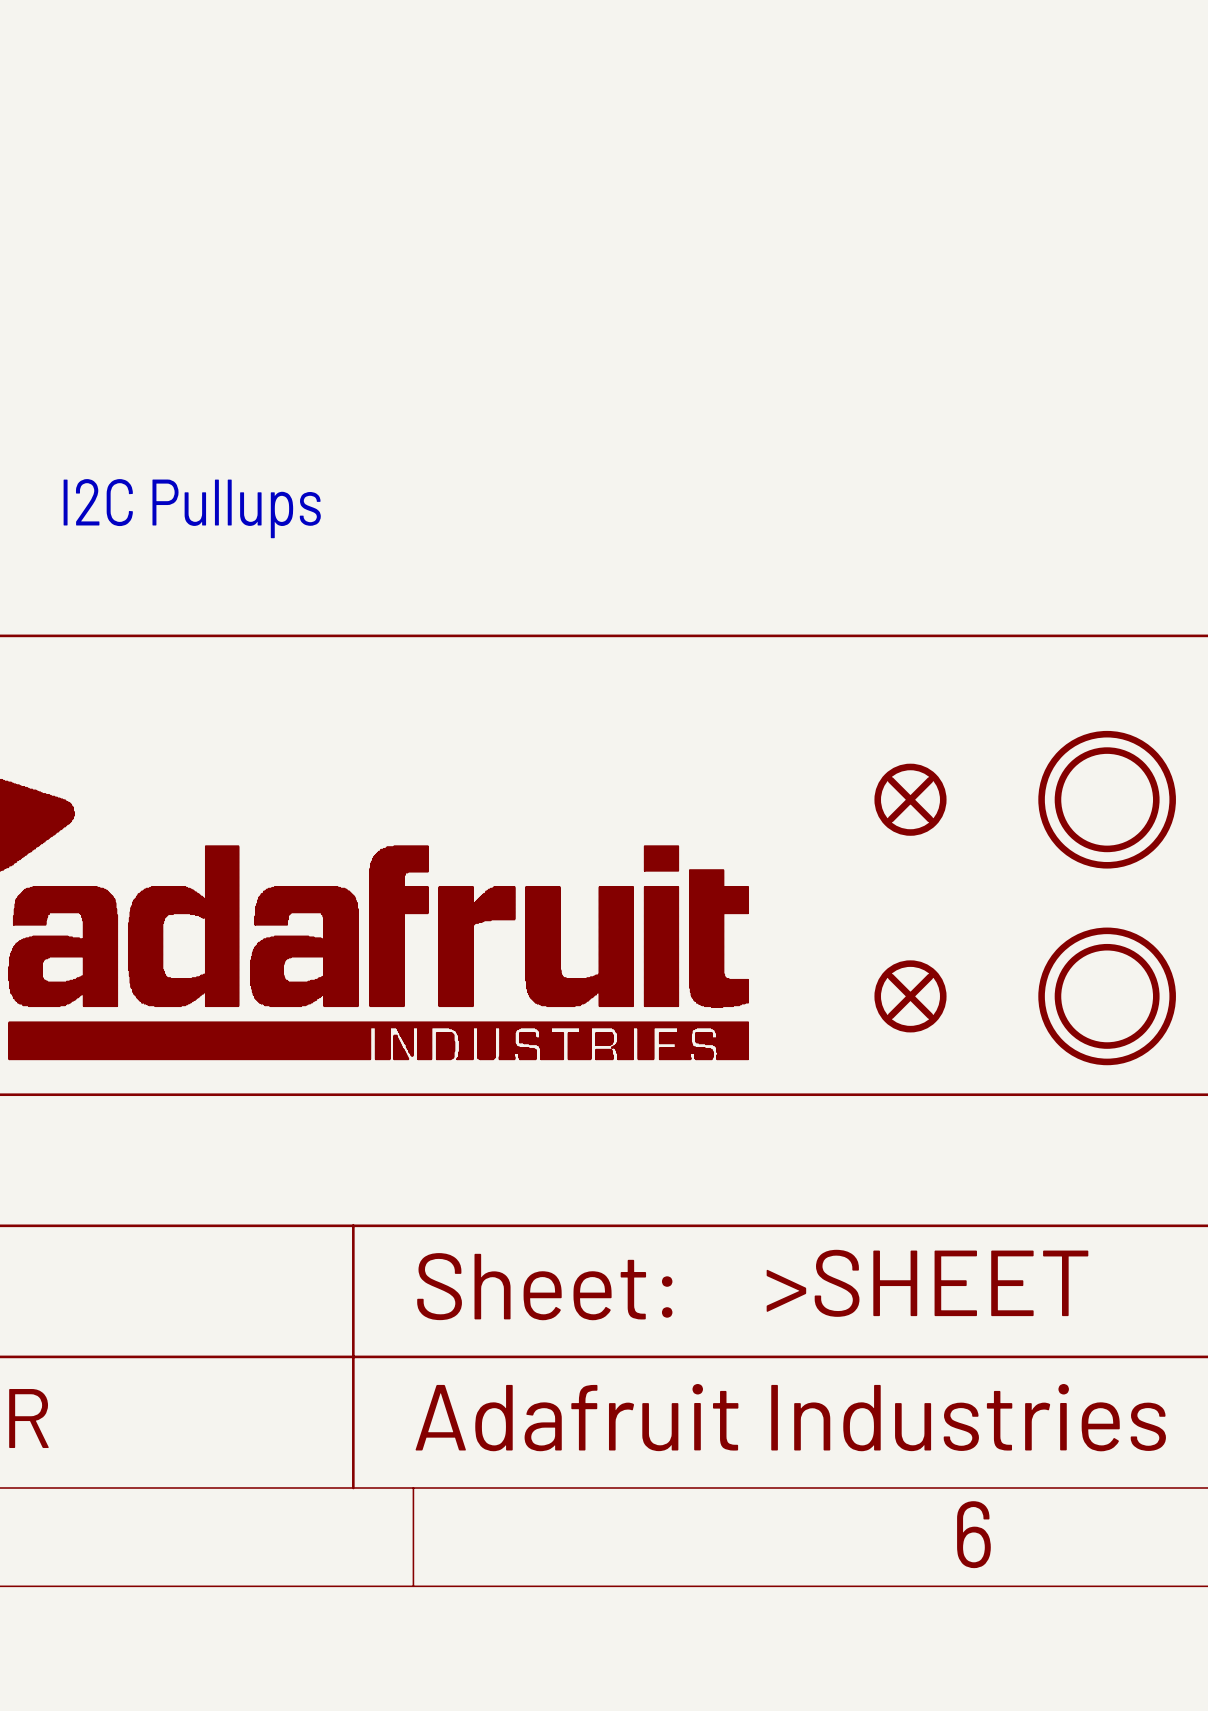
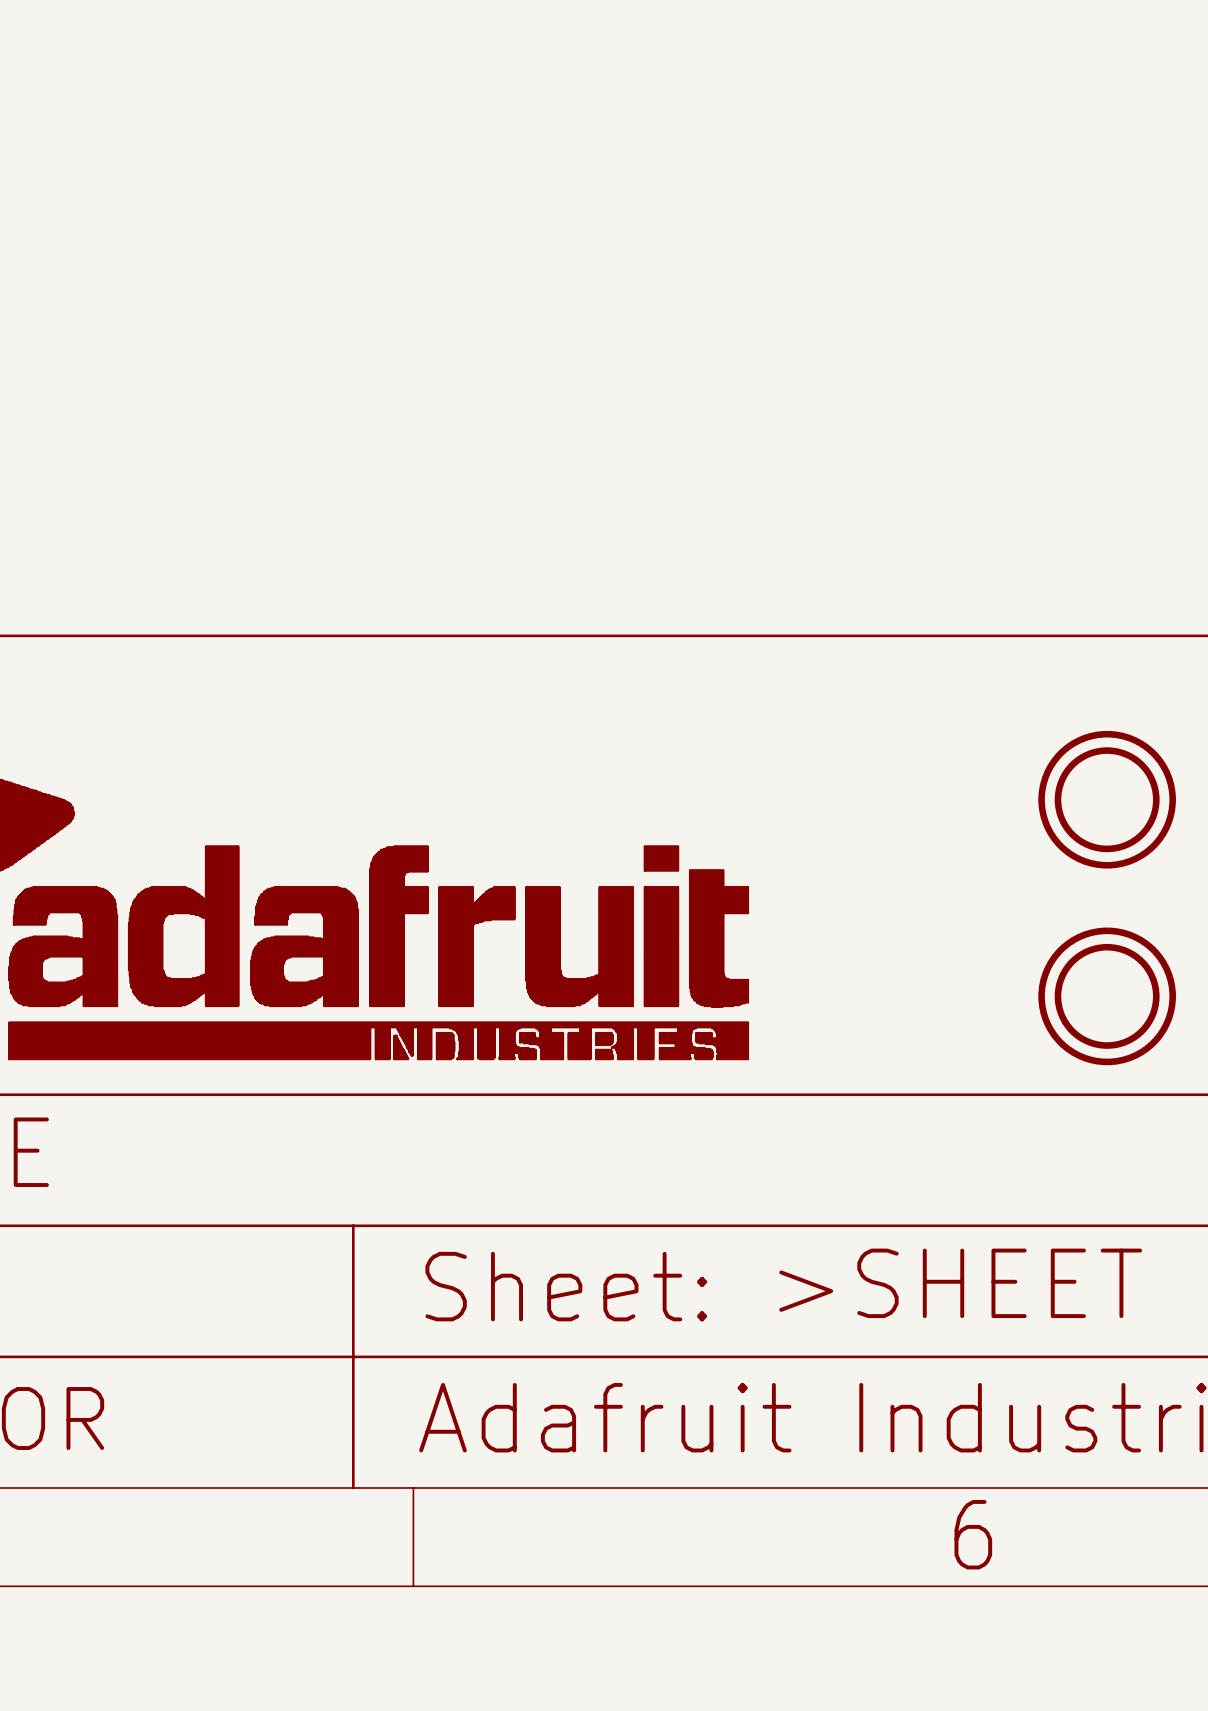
text: I2C Pullups (192, 508) -> none
part: (910, 799) -> none
part: (910, 996) -> none

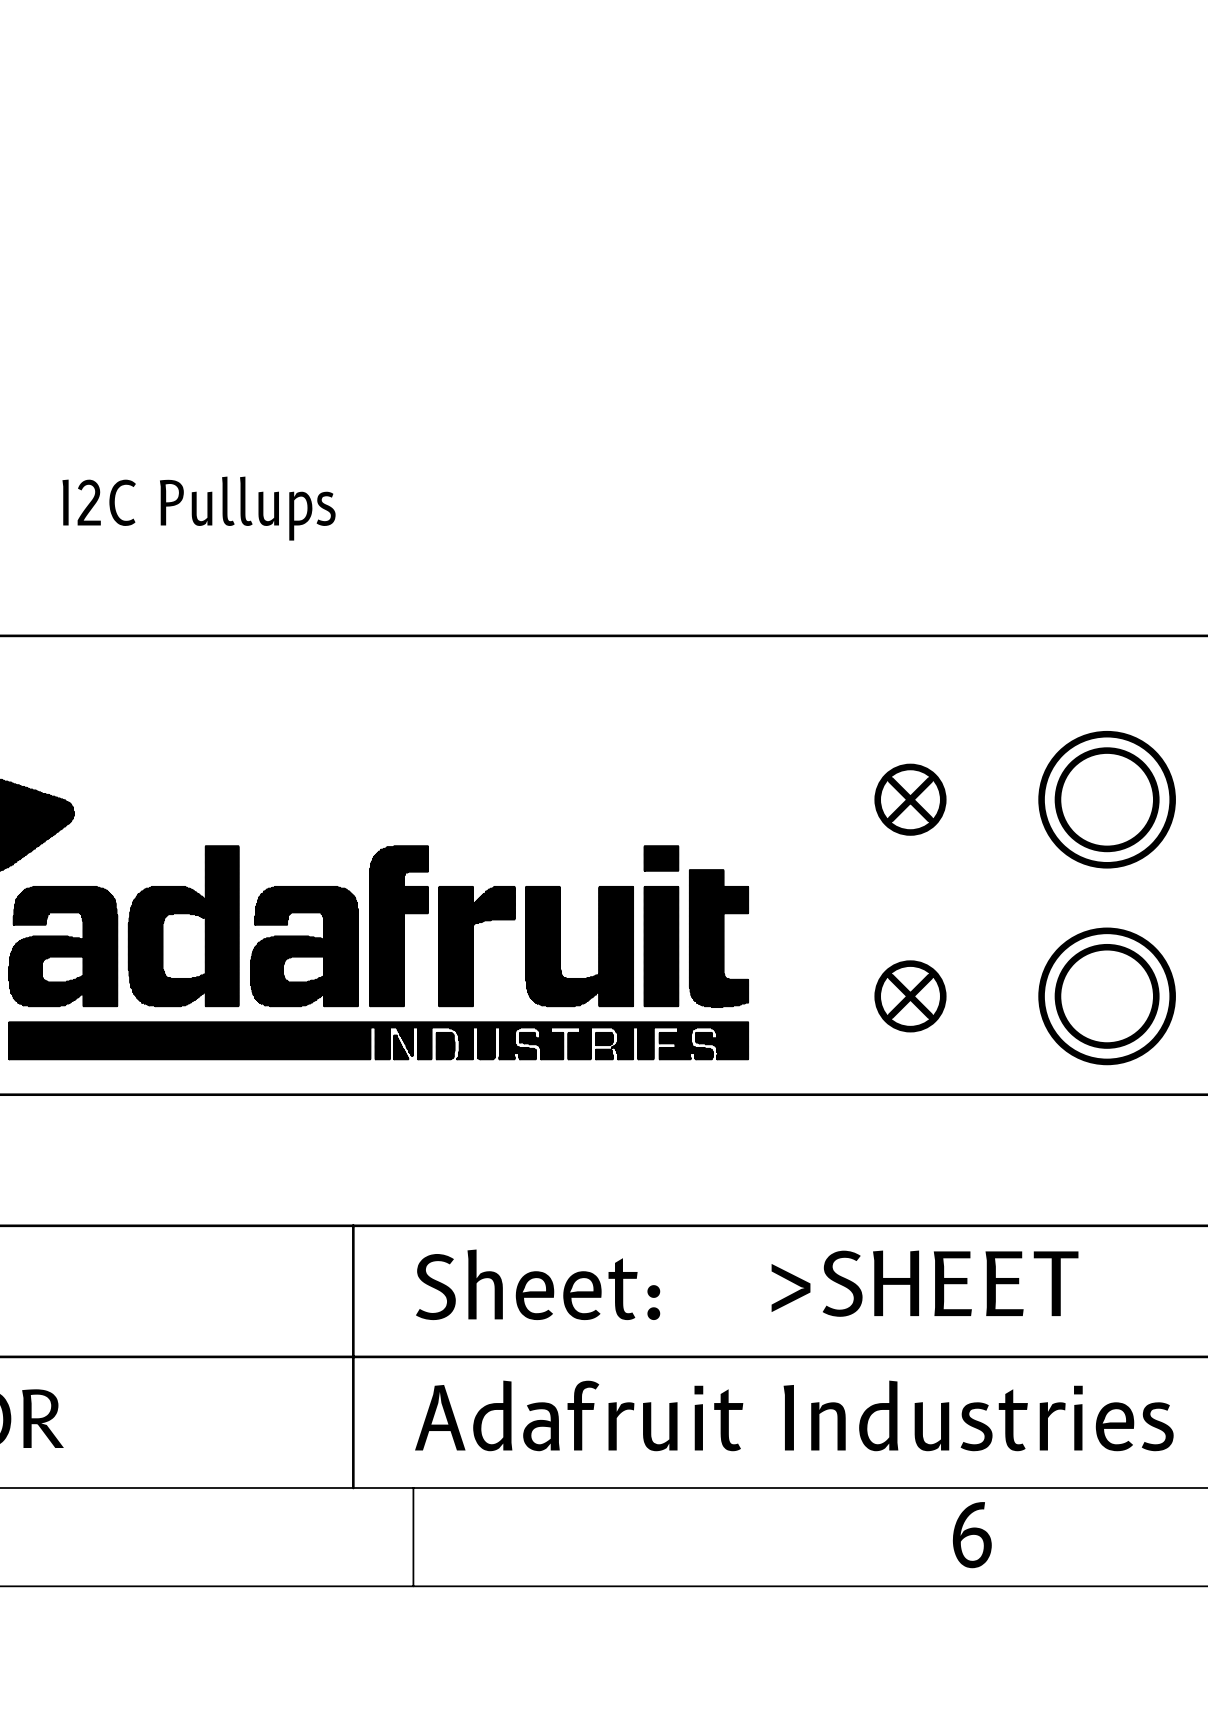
text: none -> I2C Pullups (199, 508)
part: none -> (910, 799)
part: none -> (910, 996)

